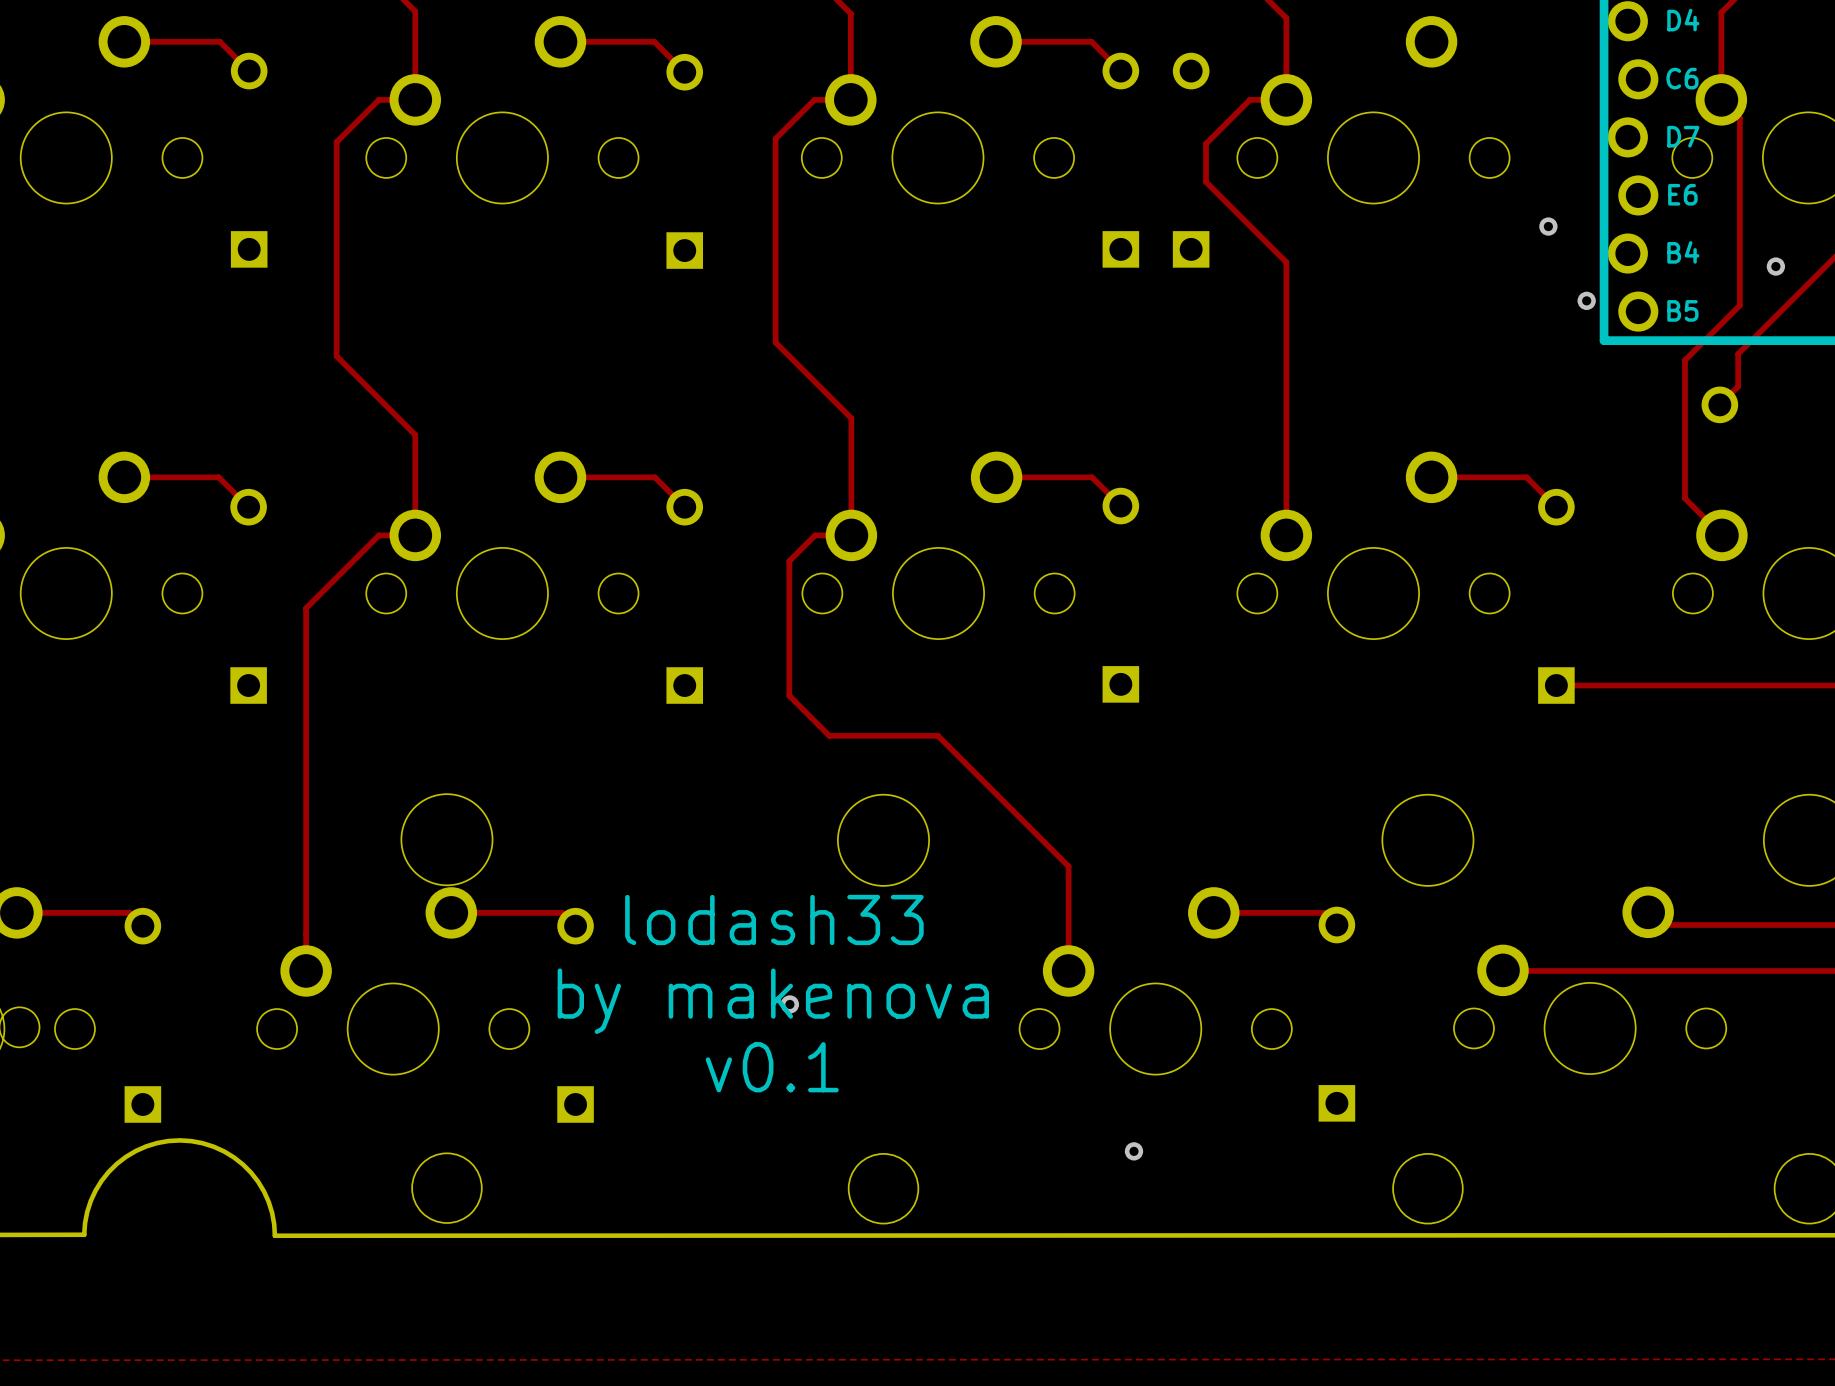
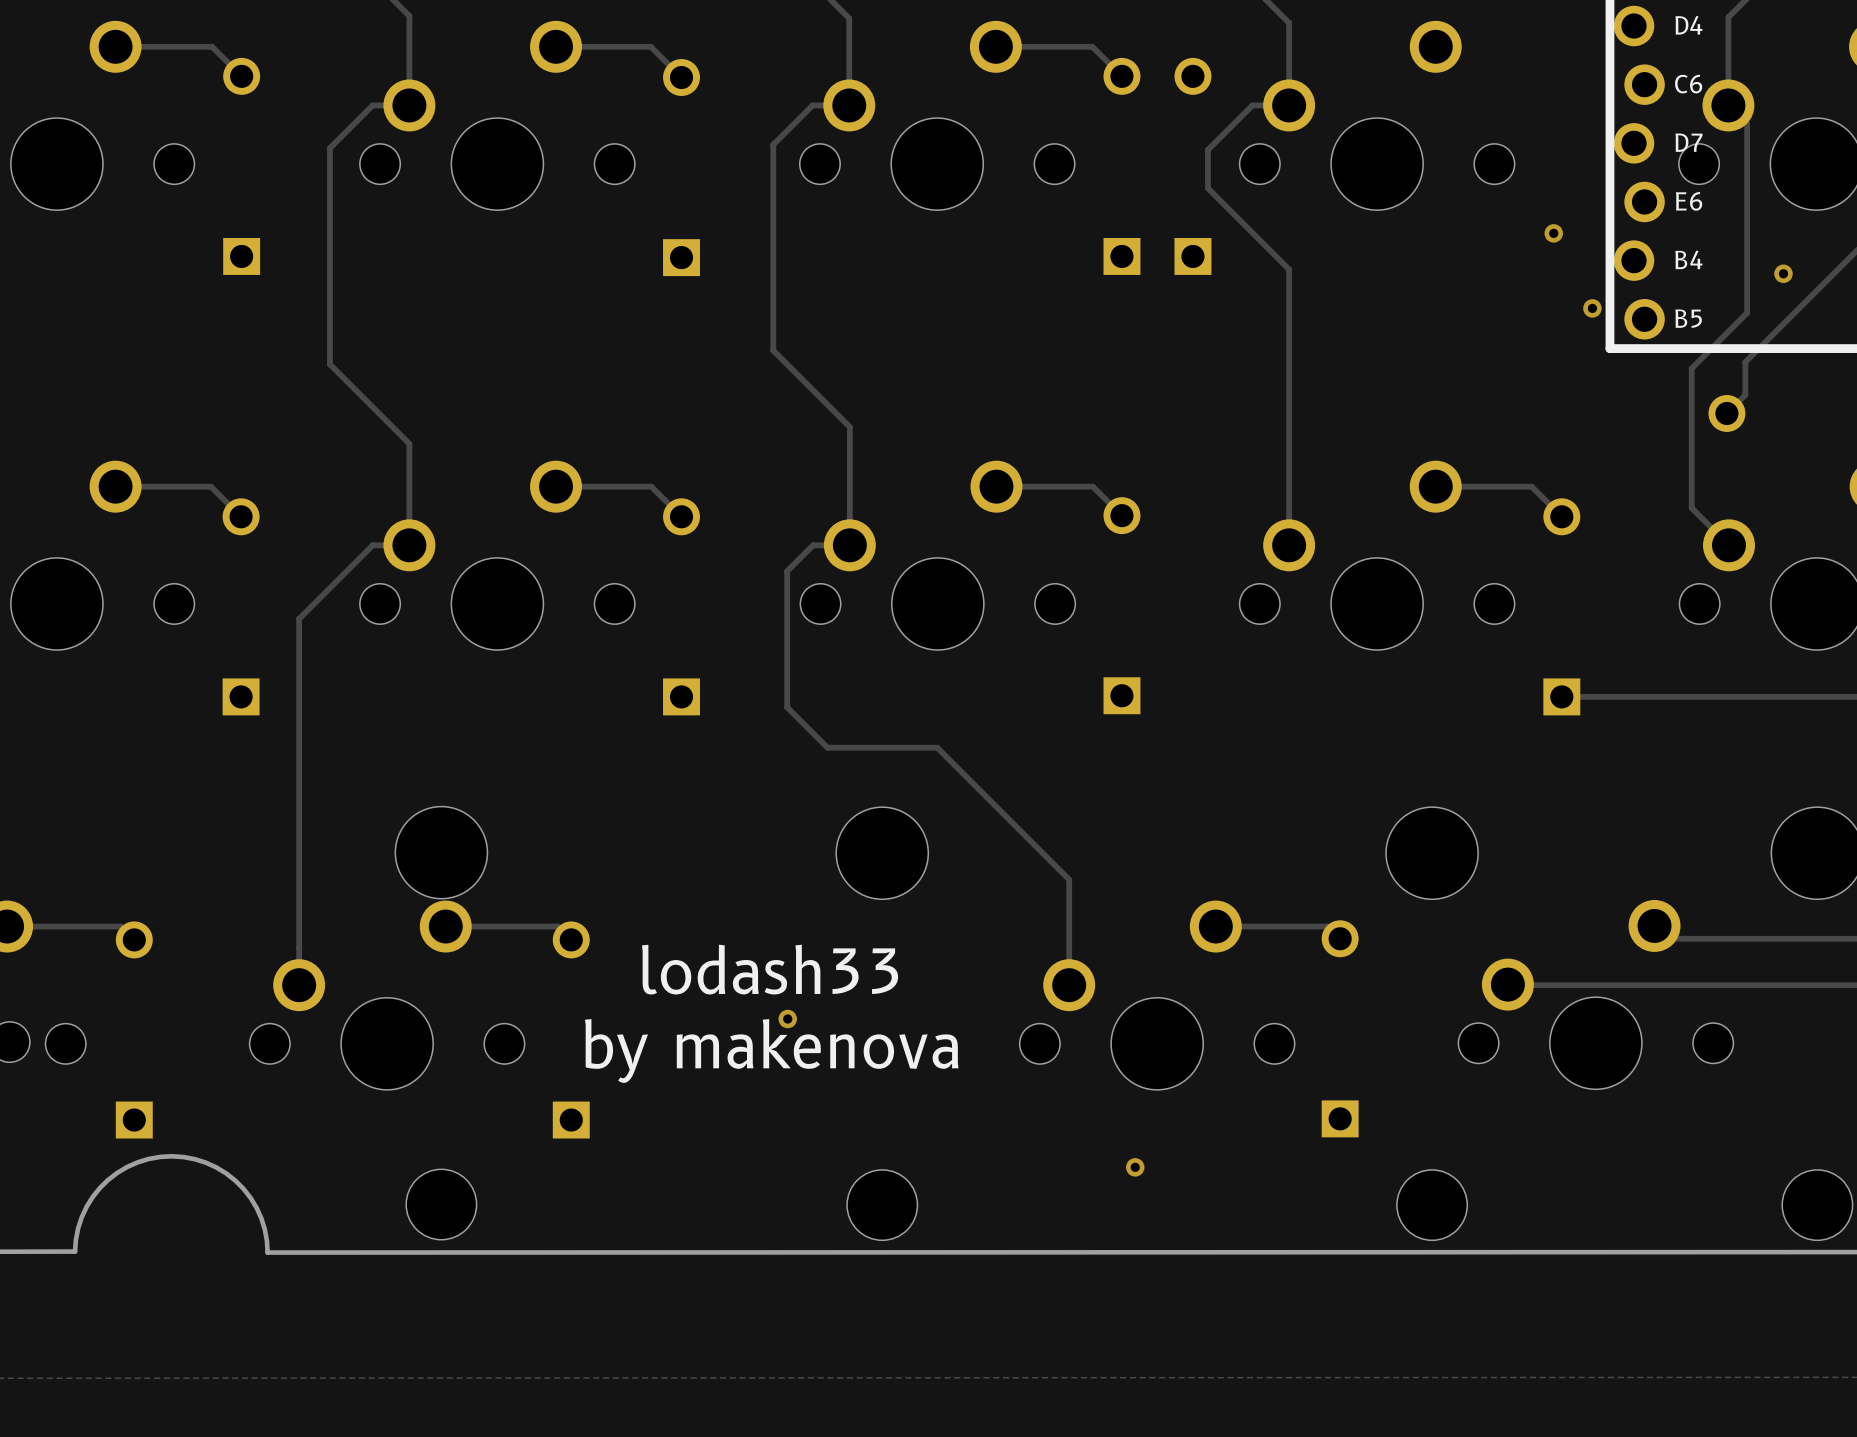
text position: lodash33 (774, 919) -> lodash33 (770, 969)
text position: by makenova (773, 1001) -> by makenova (771, 1050)
text: v0.1 (772, 1067) -> none

